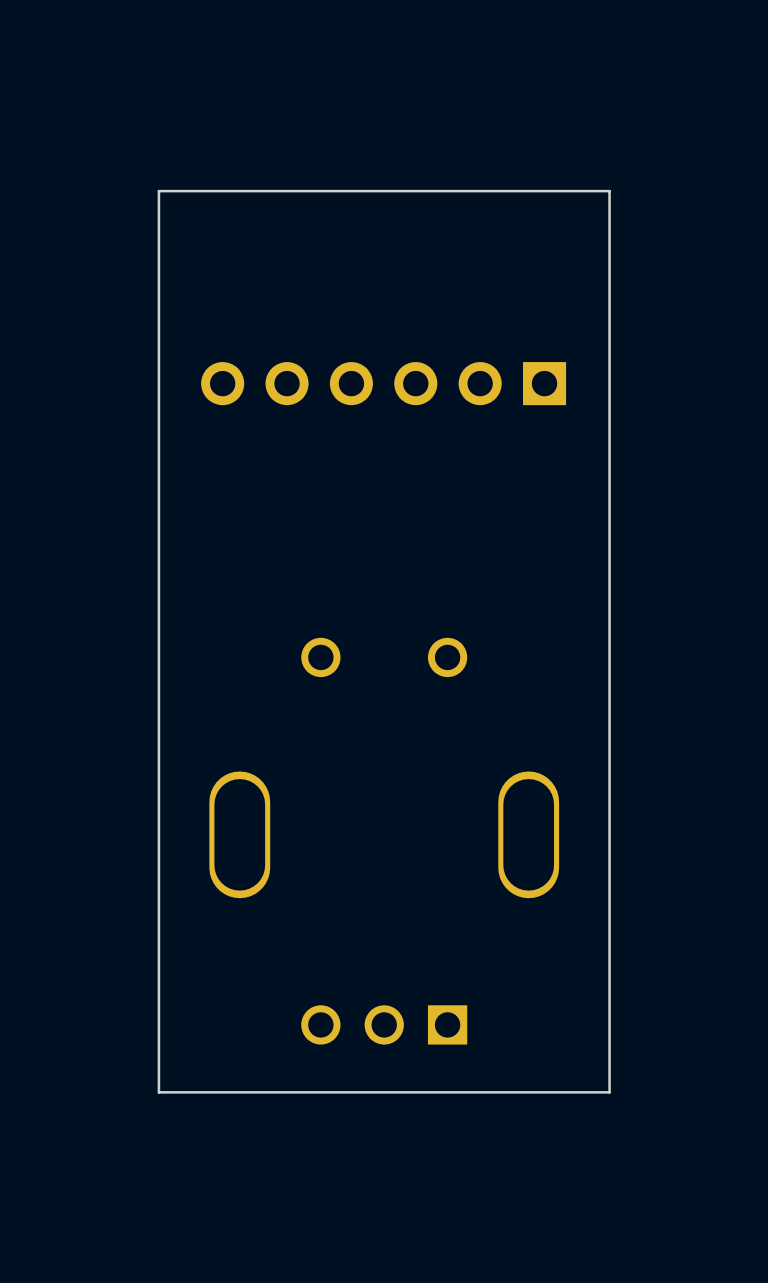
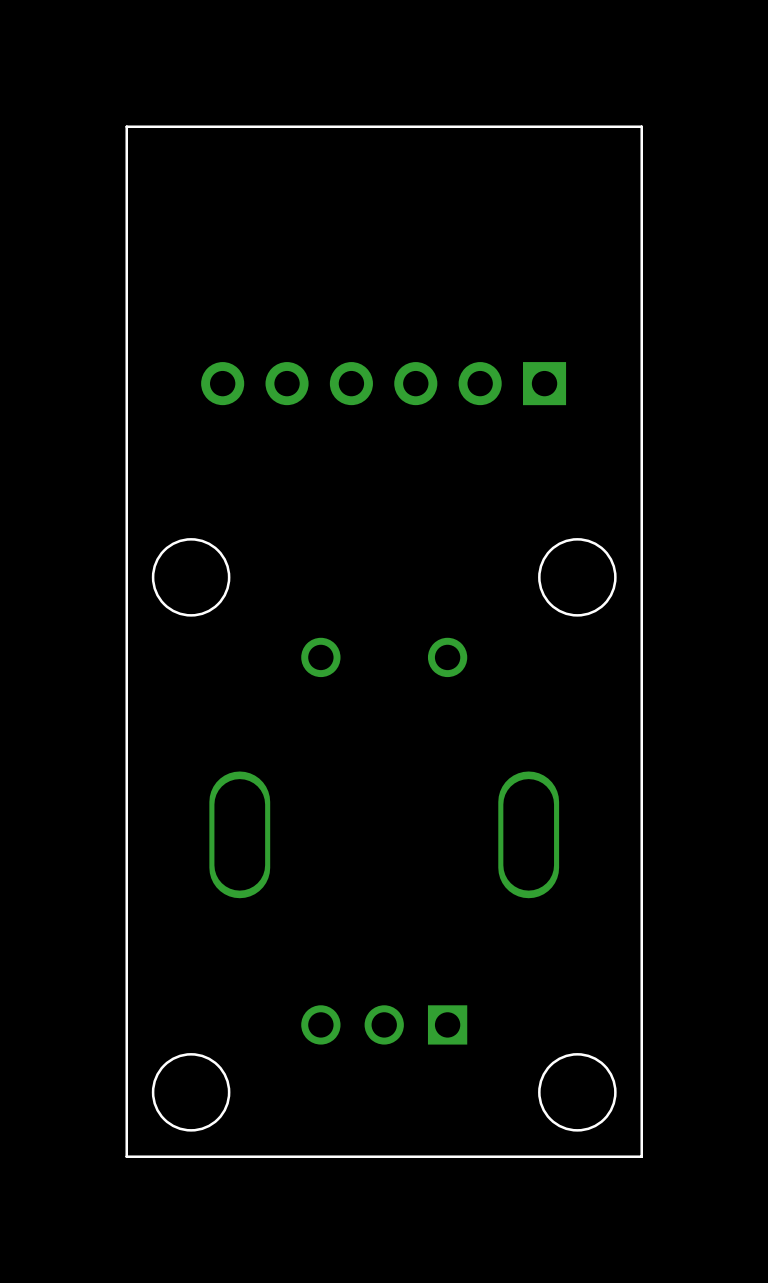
board edge: (609, 191) (158, 191) (158, 1092) (609, 1092) (609, 191) -> (641, 126) (641, 1156) (126, 1156) (126, 126) (641, 126)
round board edge: none -> [151, 538, 231, 617]
round board edge: none -> [538, 538, 617, 617]
round board edge: none -> [151, 1053, 231, 1132]
round board edge: none -> [538, 1053, 617, 1132]

